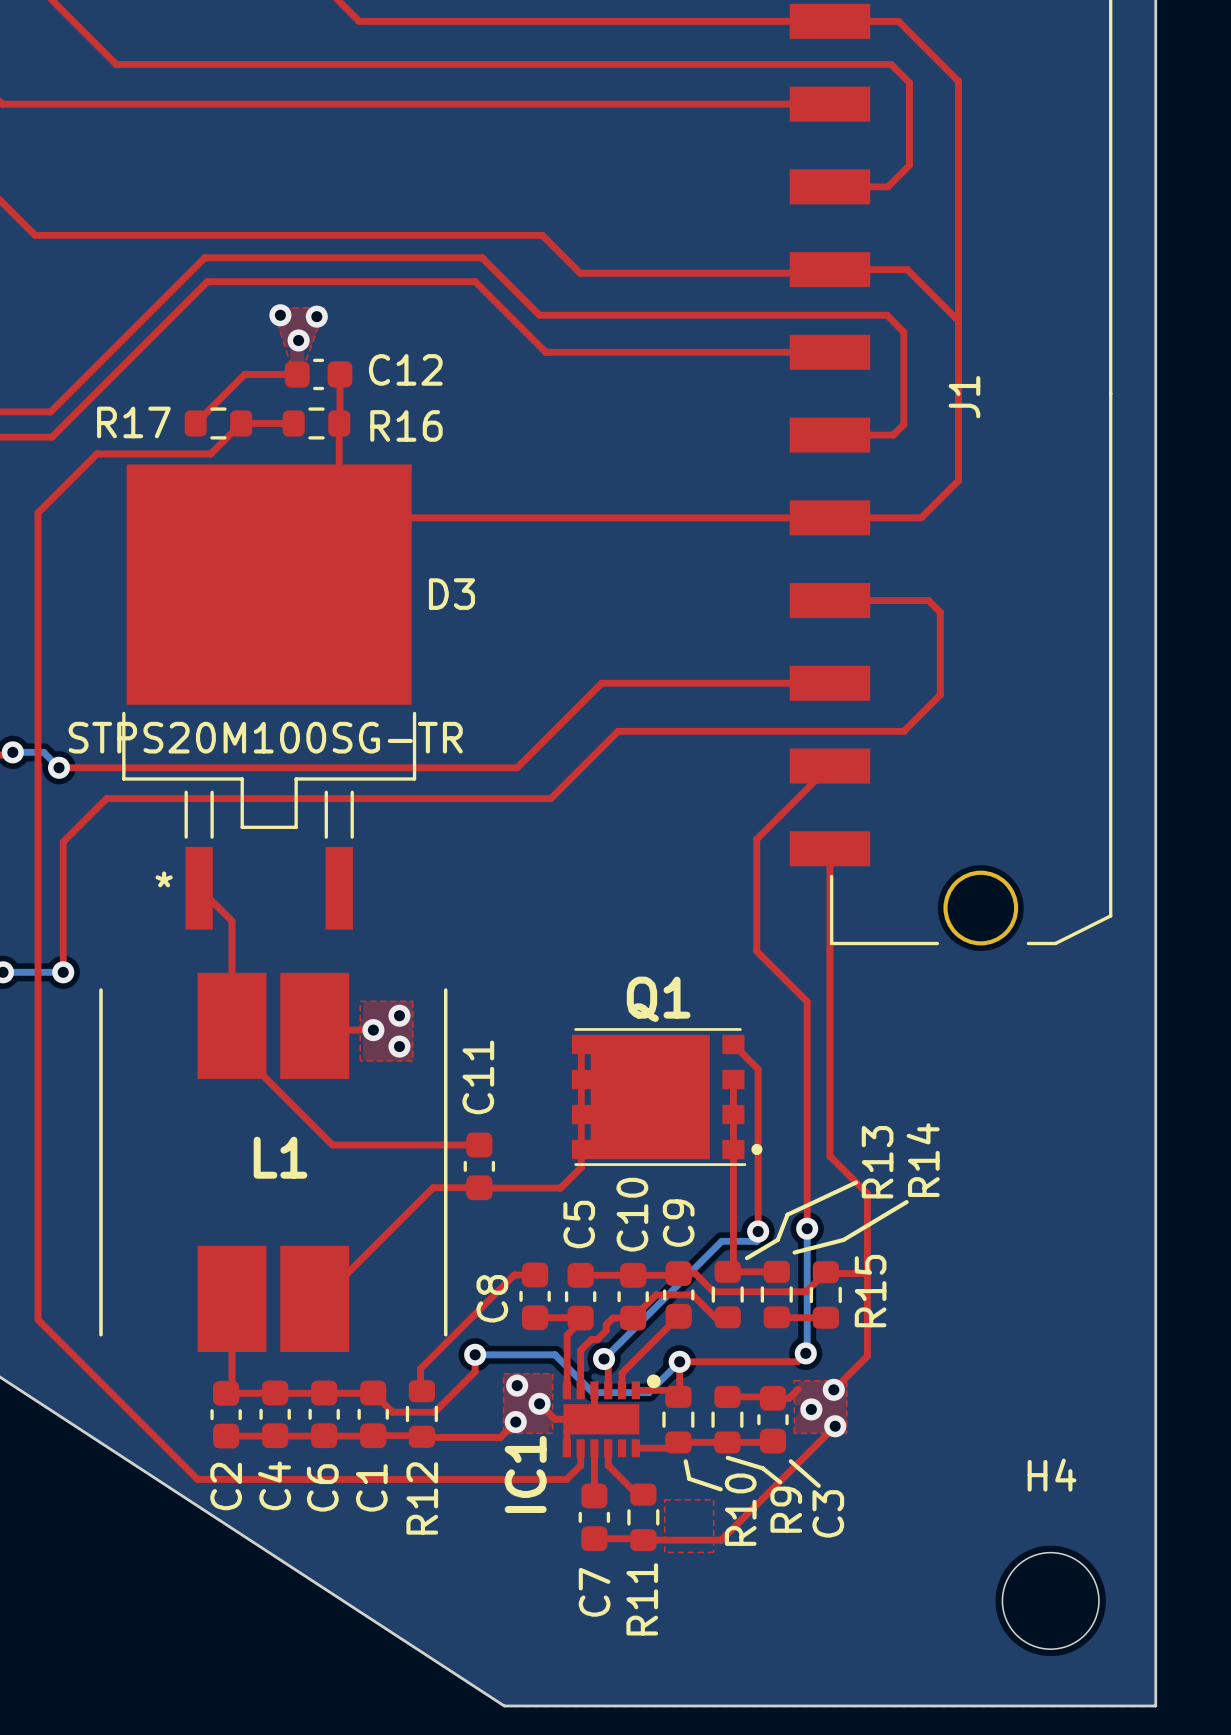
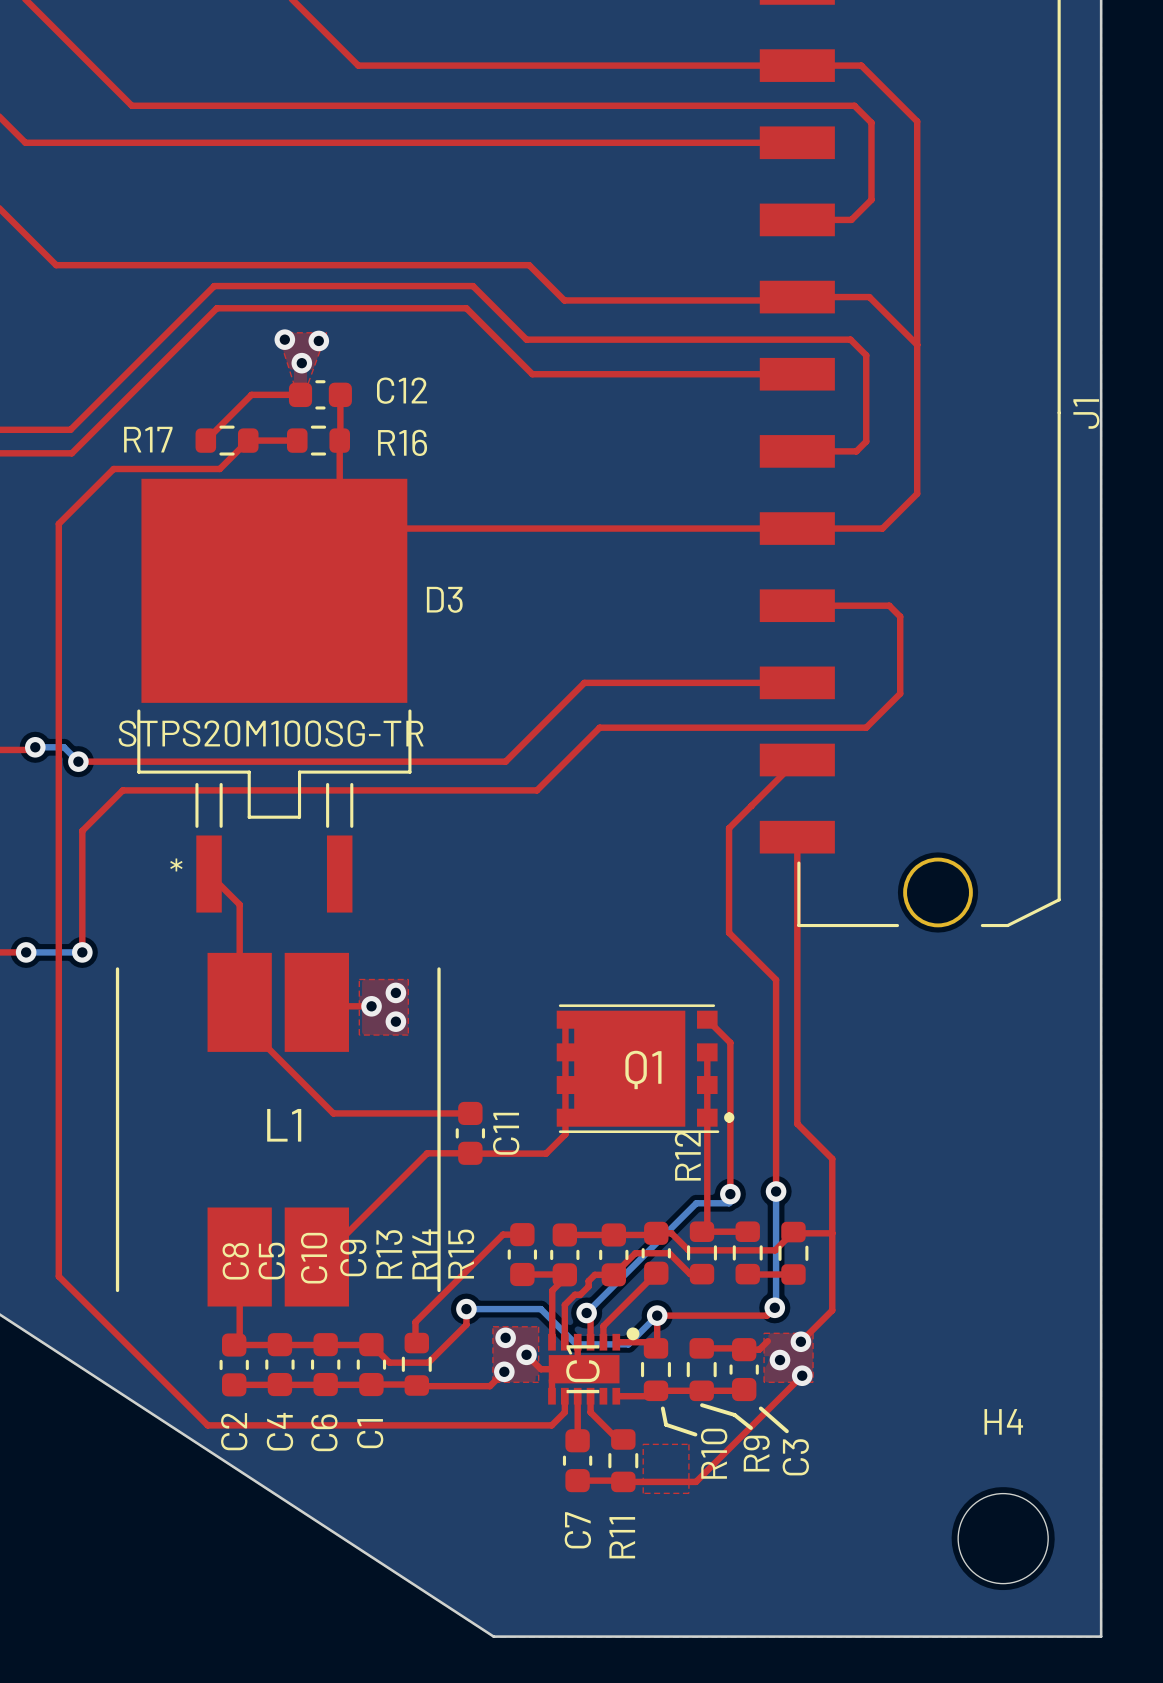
J1 name position: J1 (964, 397) -> J1 (1086, 413)
Q1 name position: Q1 (658, 999) -> Q1 (643, 1069)
C11 name position: C11 (478, 1077) -> C11 (506, 1133)
R14 name position: R14 (923, 1160) -> R14 (425, 1254)
R13 name position: R13 (877, 1162) -> R13 (389, 1254)
line: (856, 1182) (787, 1214) (777, 1239) (746, 1258) -> none
line: (906, 1202) (843, 1239) (794, 1252) -> none
C10 name position: C10 (632, 1214) -> C10 (314, 1258)
C9 name position: C9 (678, 1223) -> C9 (353, 1258)
C5 name position: C5 (579, 1224) -> C5 (271, 1261)
R15 name position: R15 (870, 1291) -> R15 (461, 1254)
C8 name position: C8 (492, 1298) -> C8 (235, 1261)
IC1 name position: IC1 (525, 1474) -> IC1 (582, 1369)
R12 name position: R12 (422, 1498) -> R12 (687, 1155)

